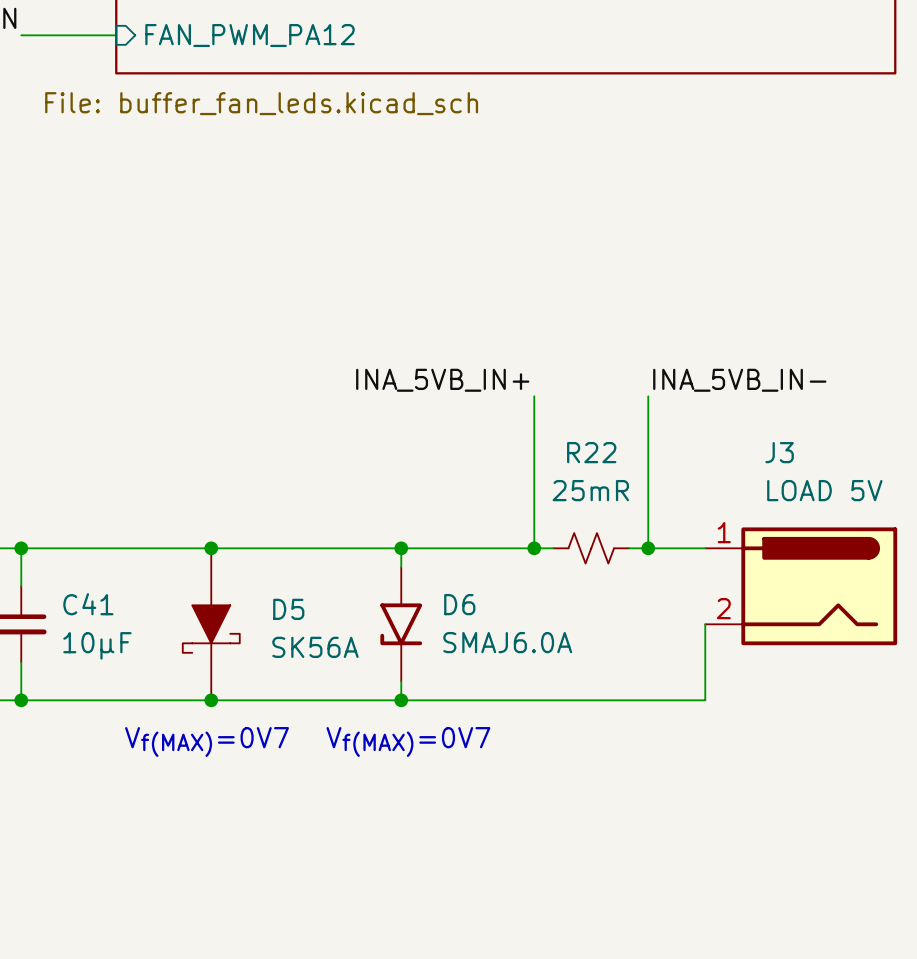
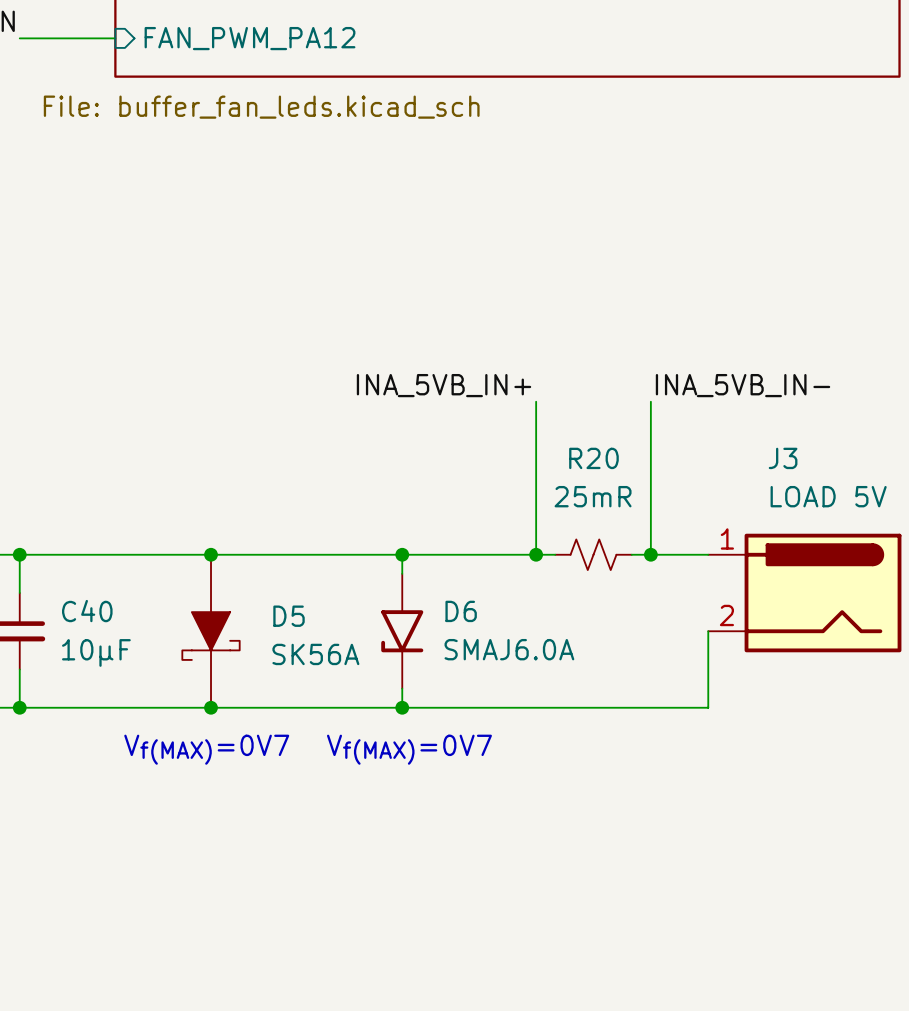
R22 name: R22 (591, 452) -> R20 (593, 458)
C41 name: C41 (88, 604) -> C40 (87, 611)

